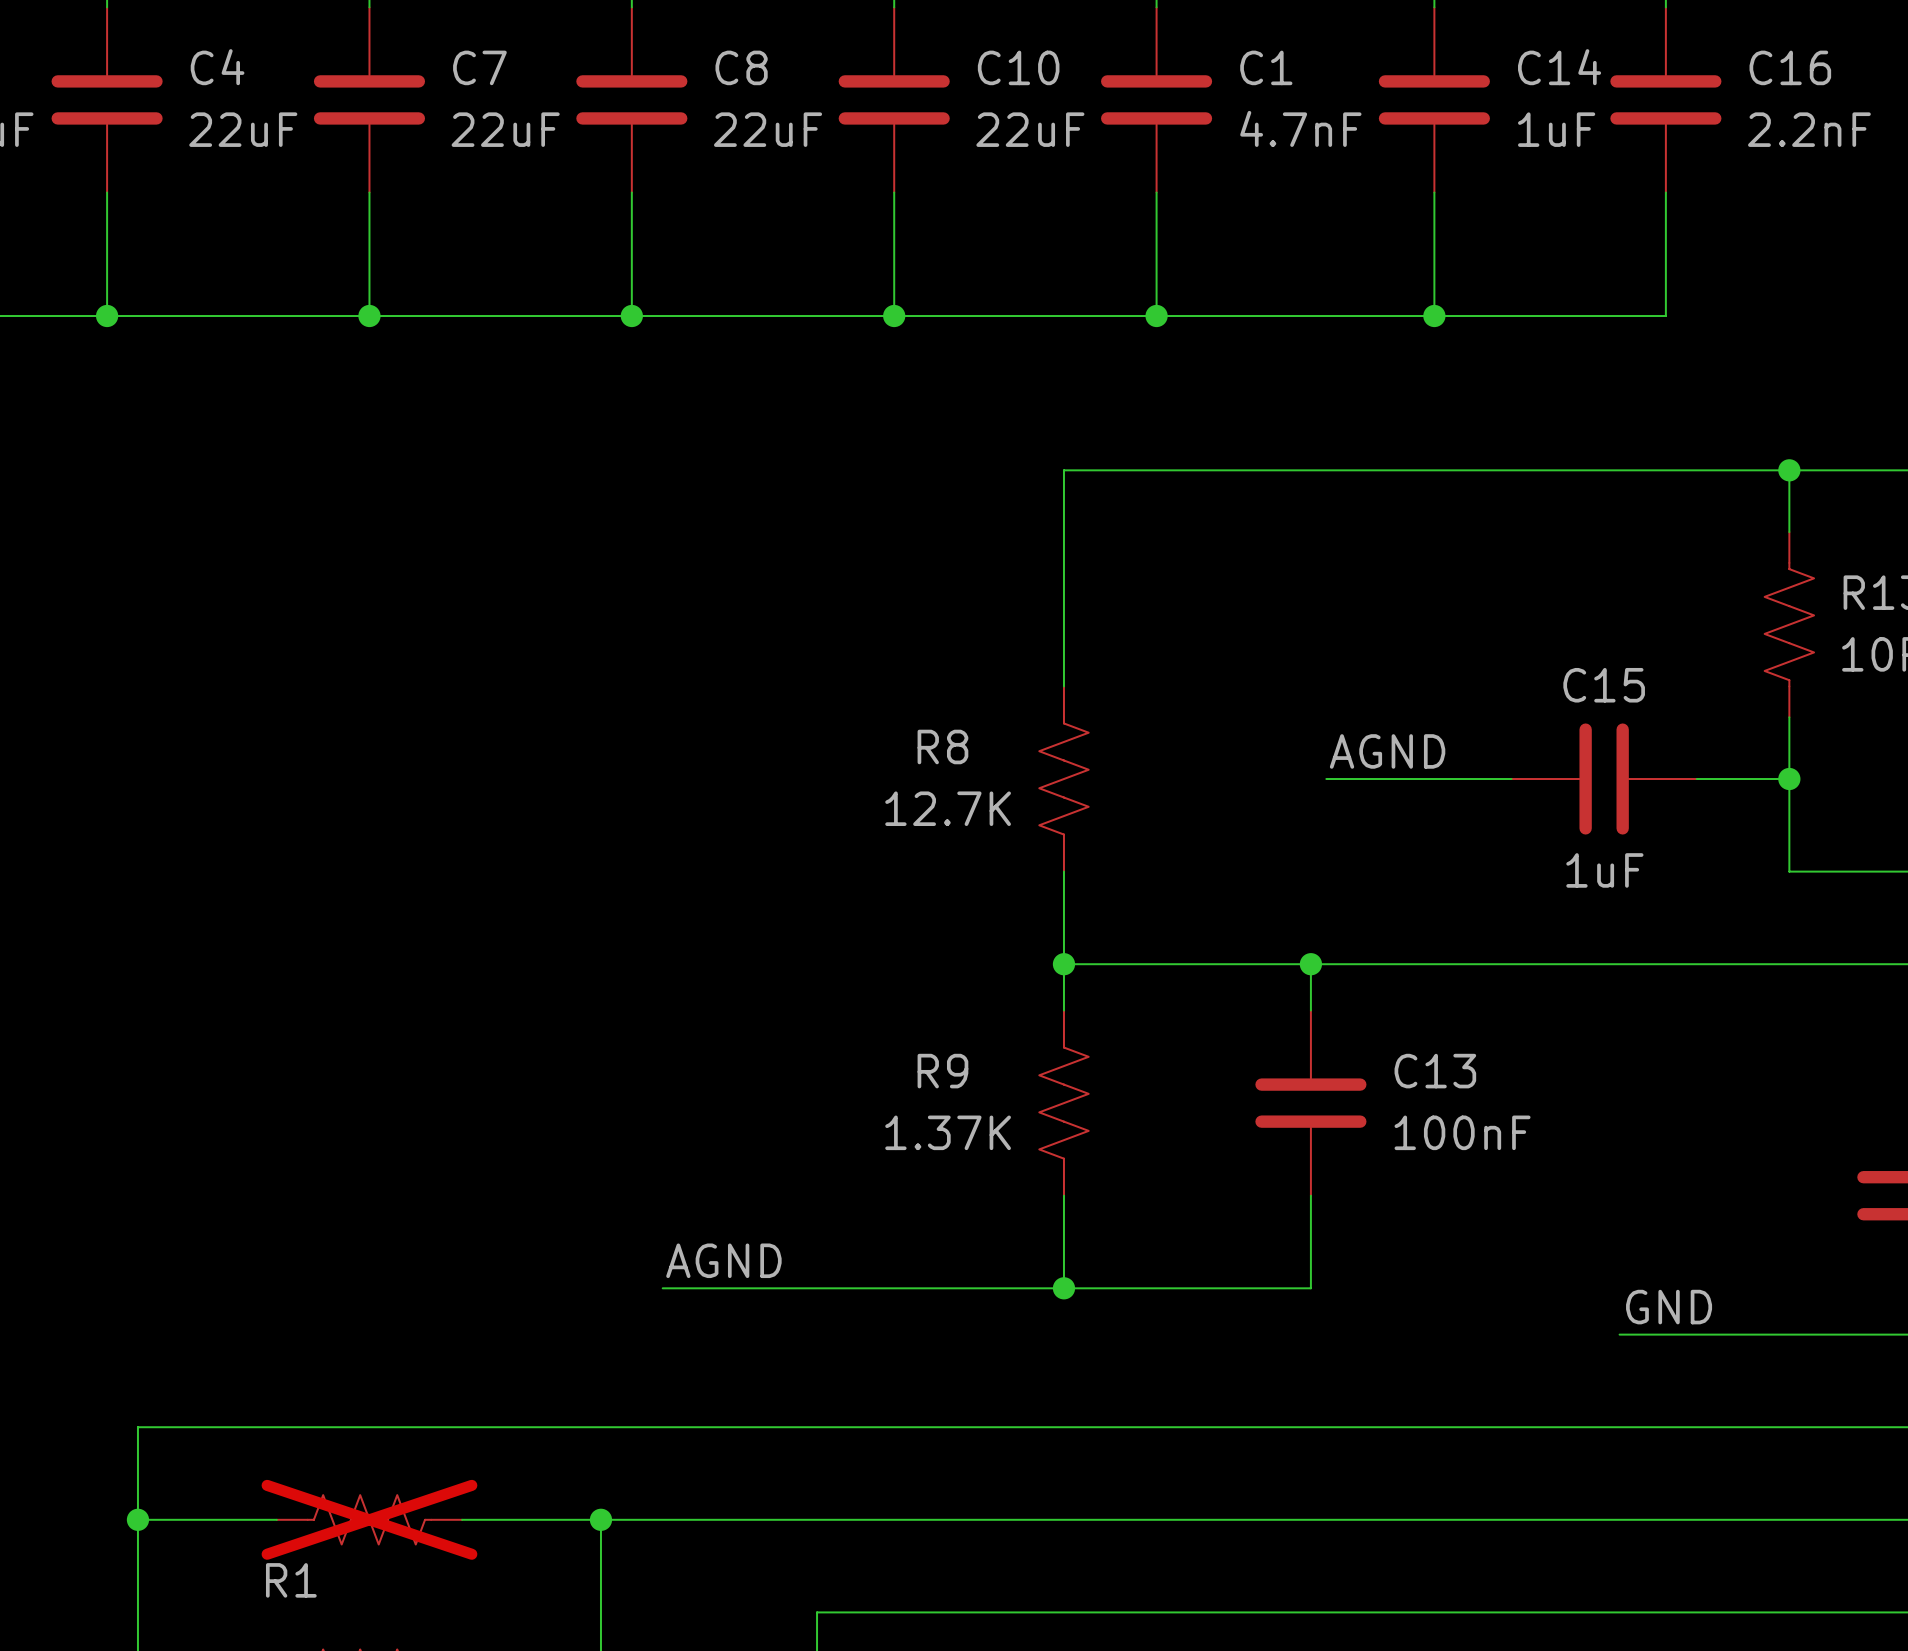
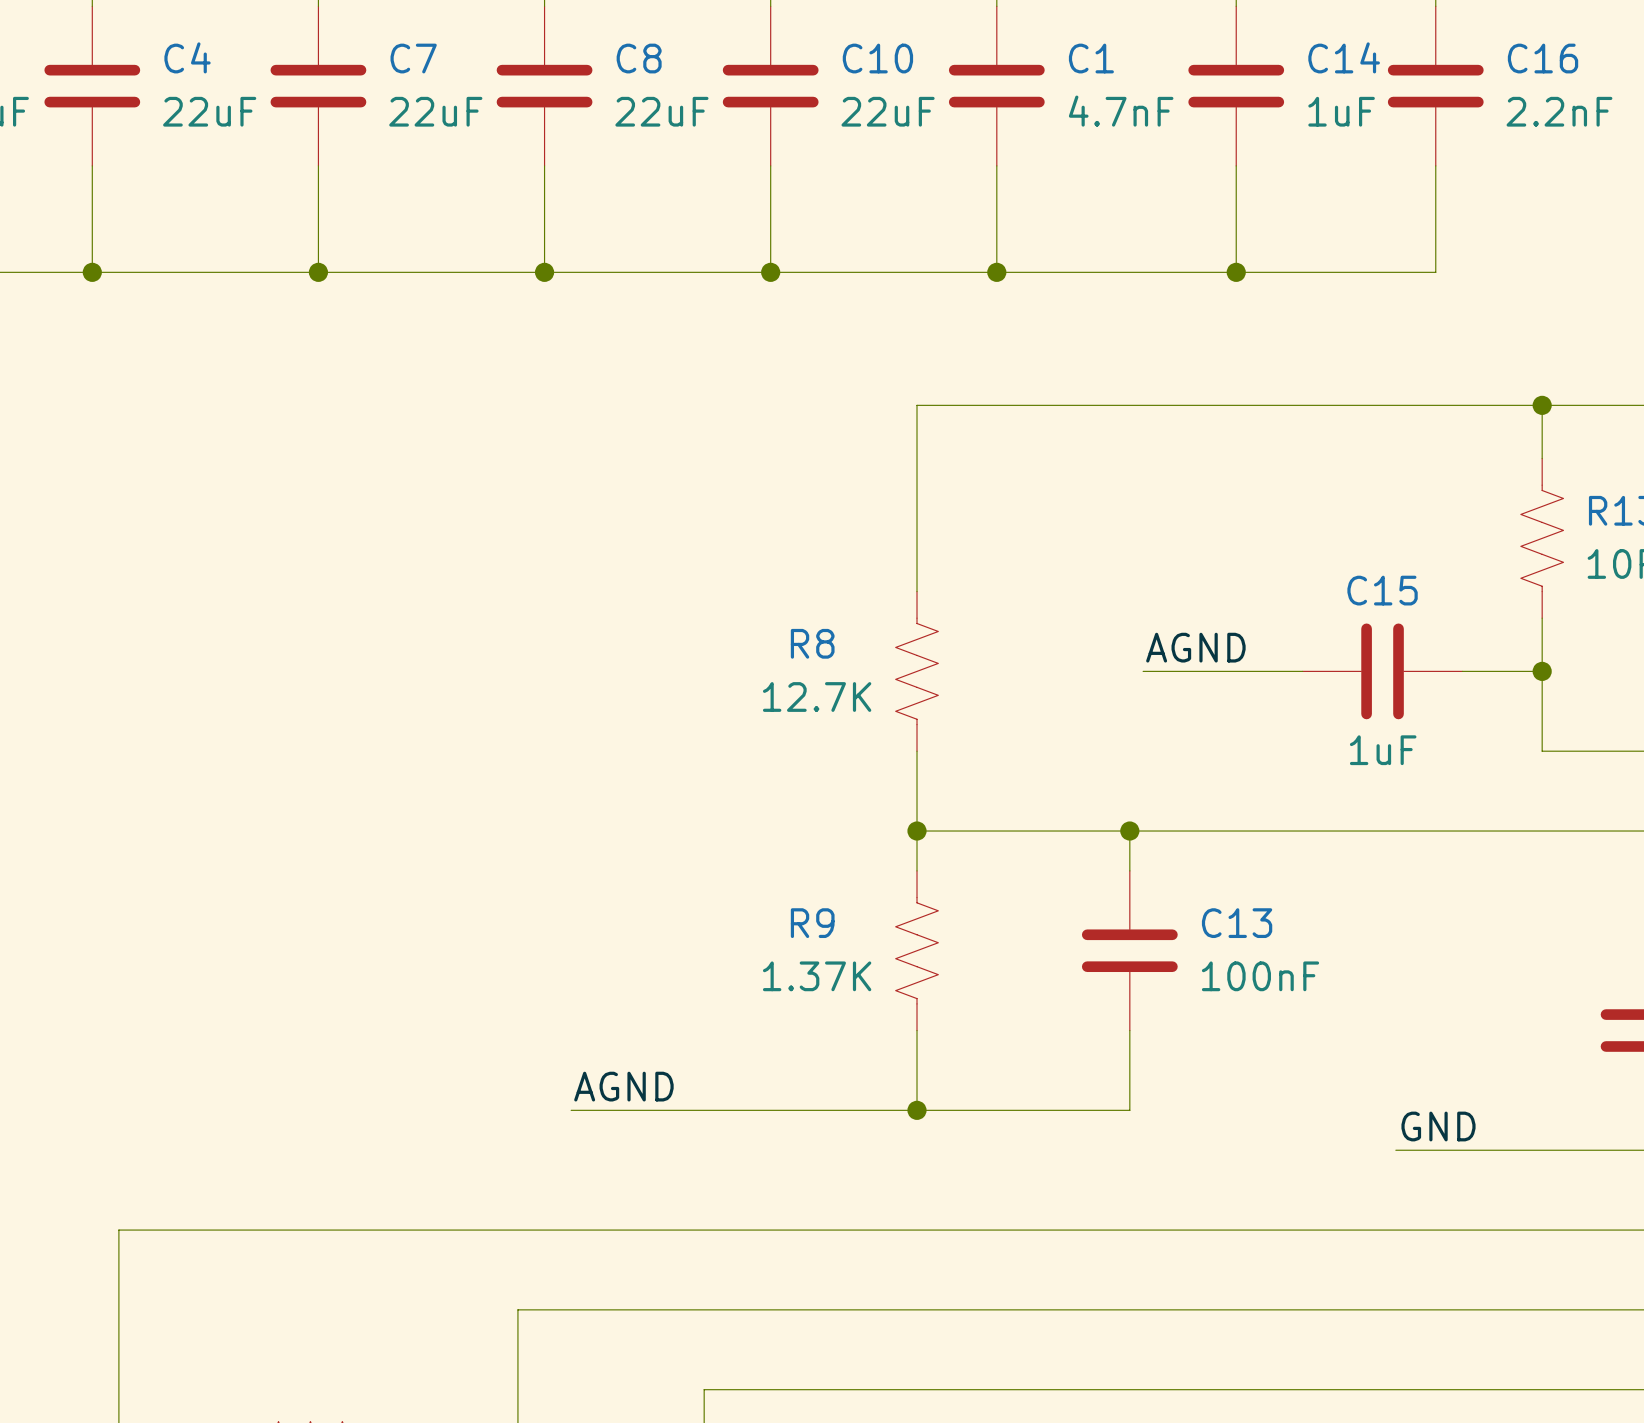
wire: (137, 1519) (276, 1519) -> none
junction: (137, 1519) -> none
R1: (369, 1519) -> none
wire: (462, 1519) (600, 1519) -> none
junction: (600, 1519) -> none

